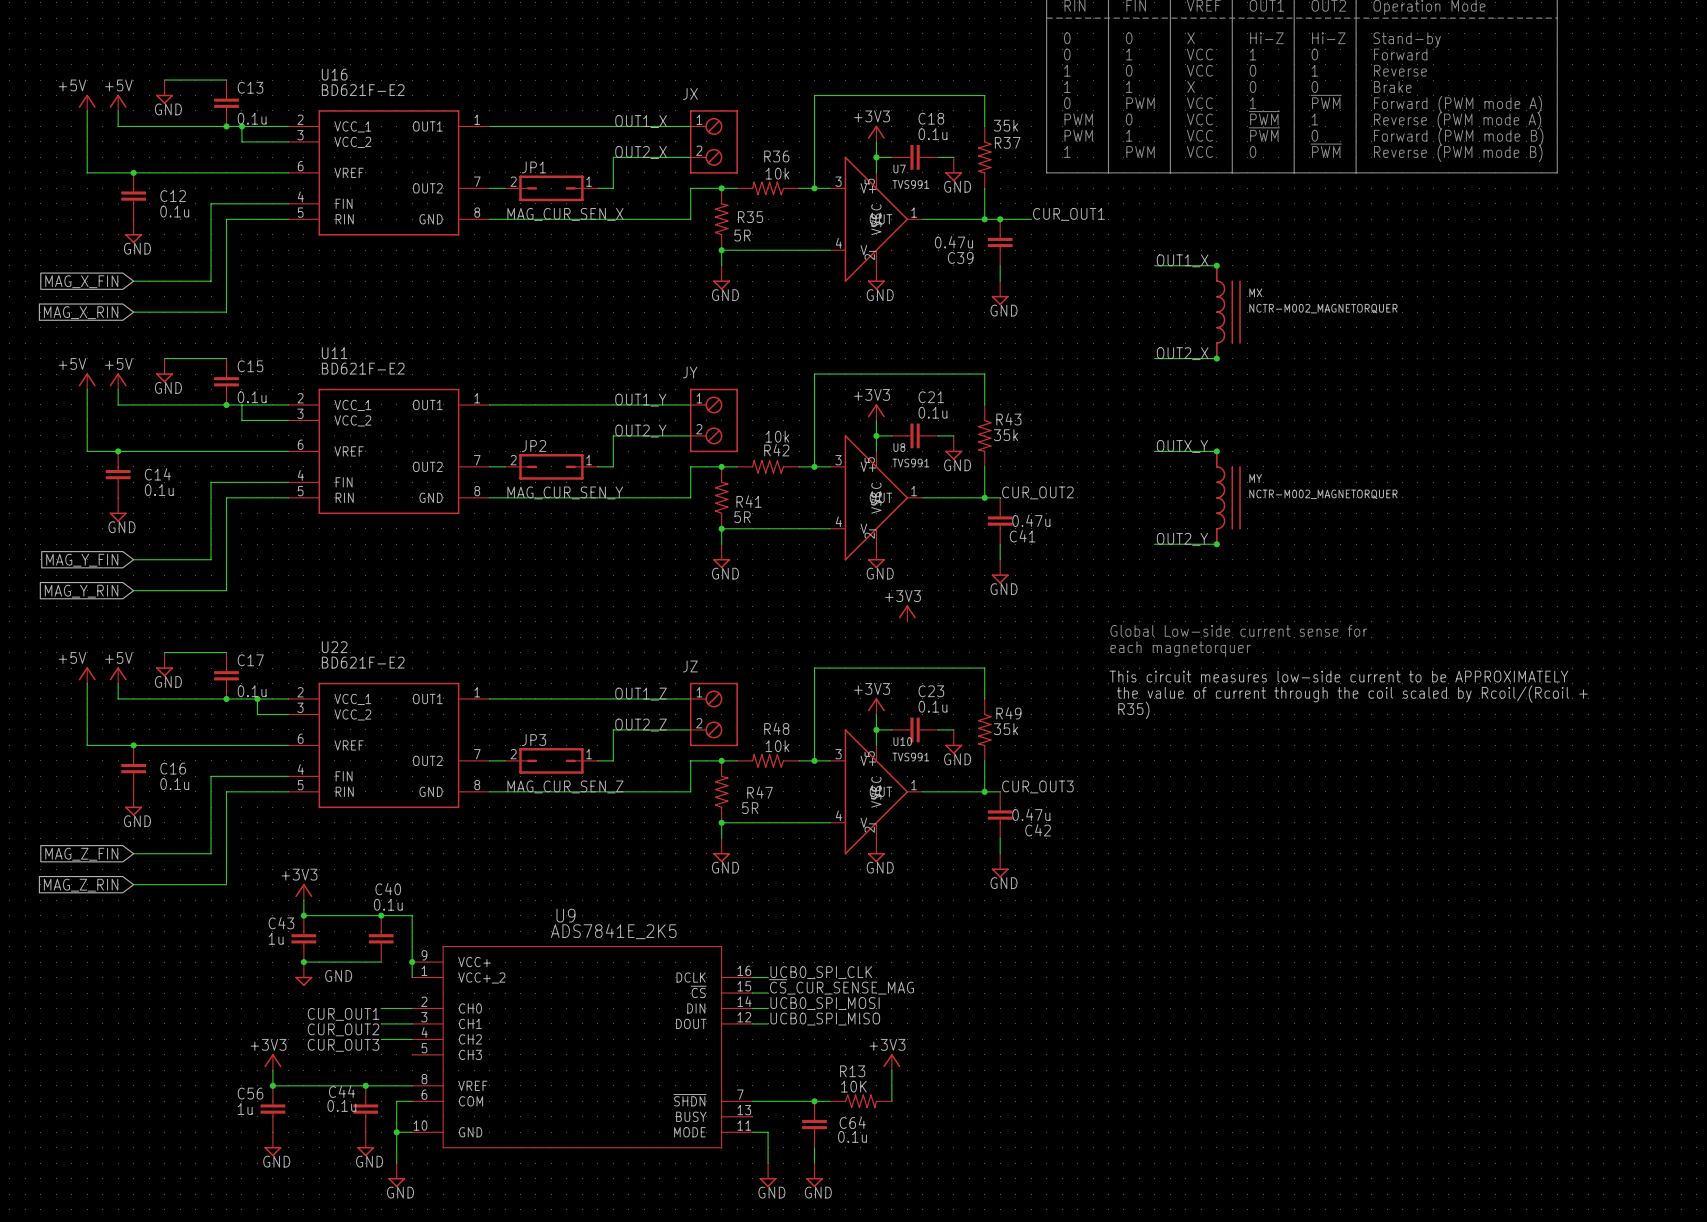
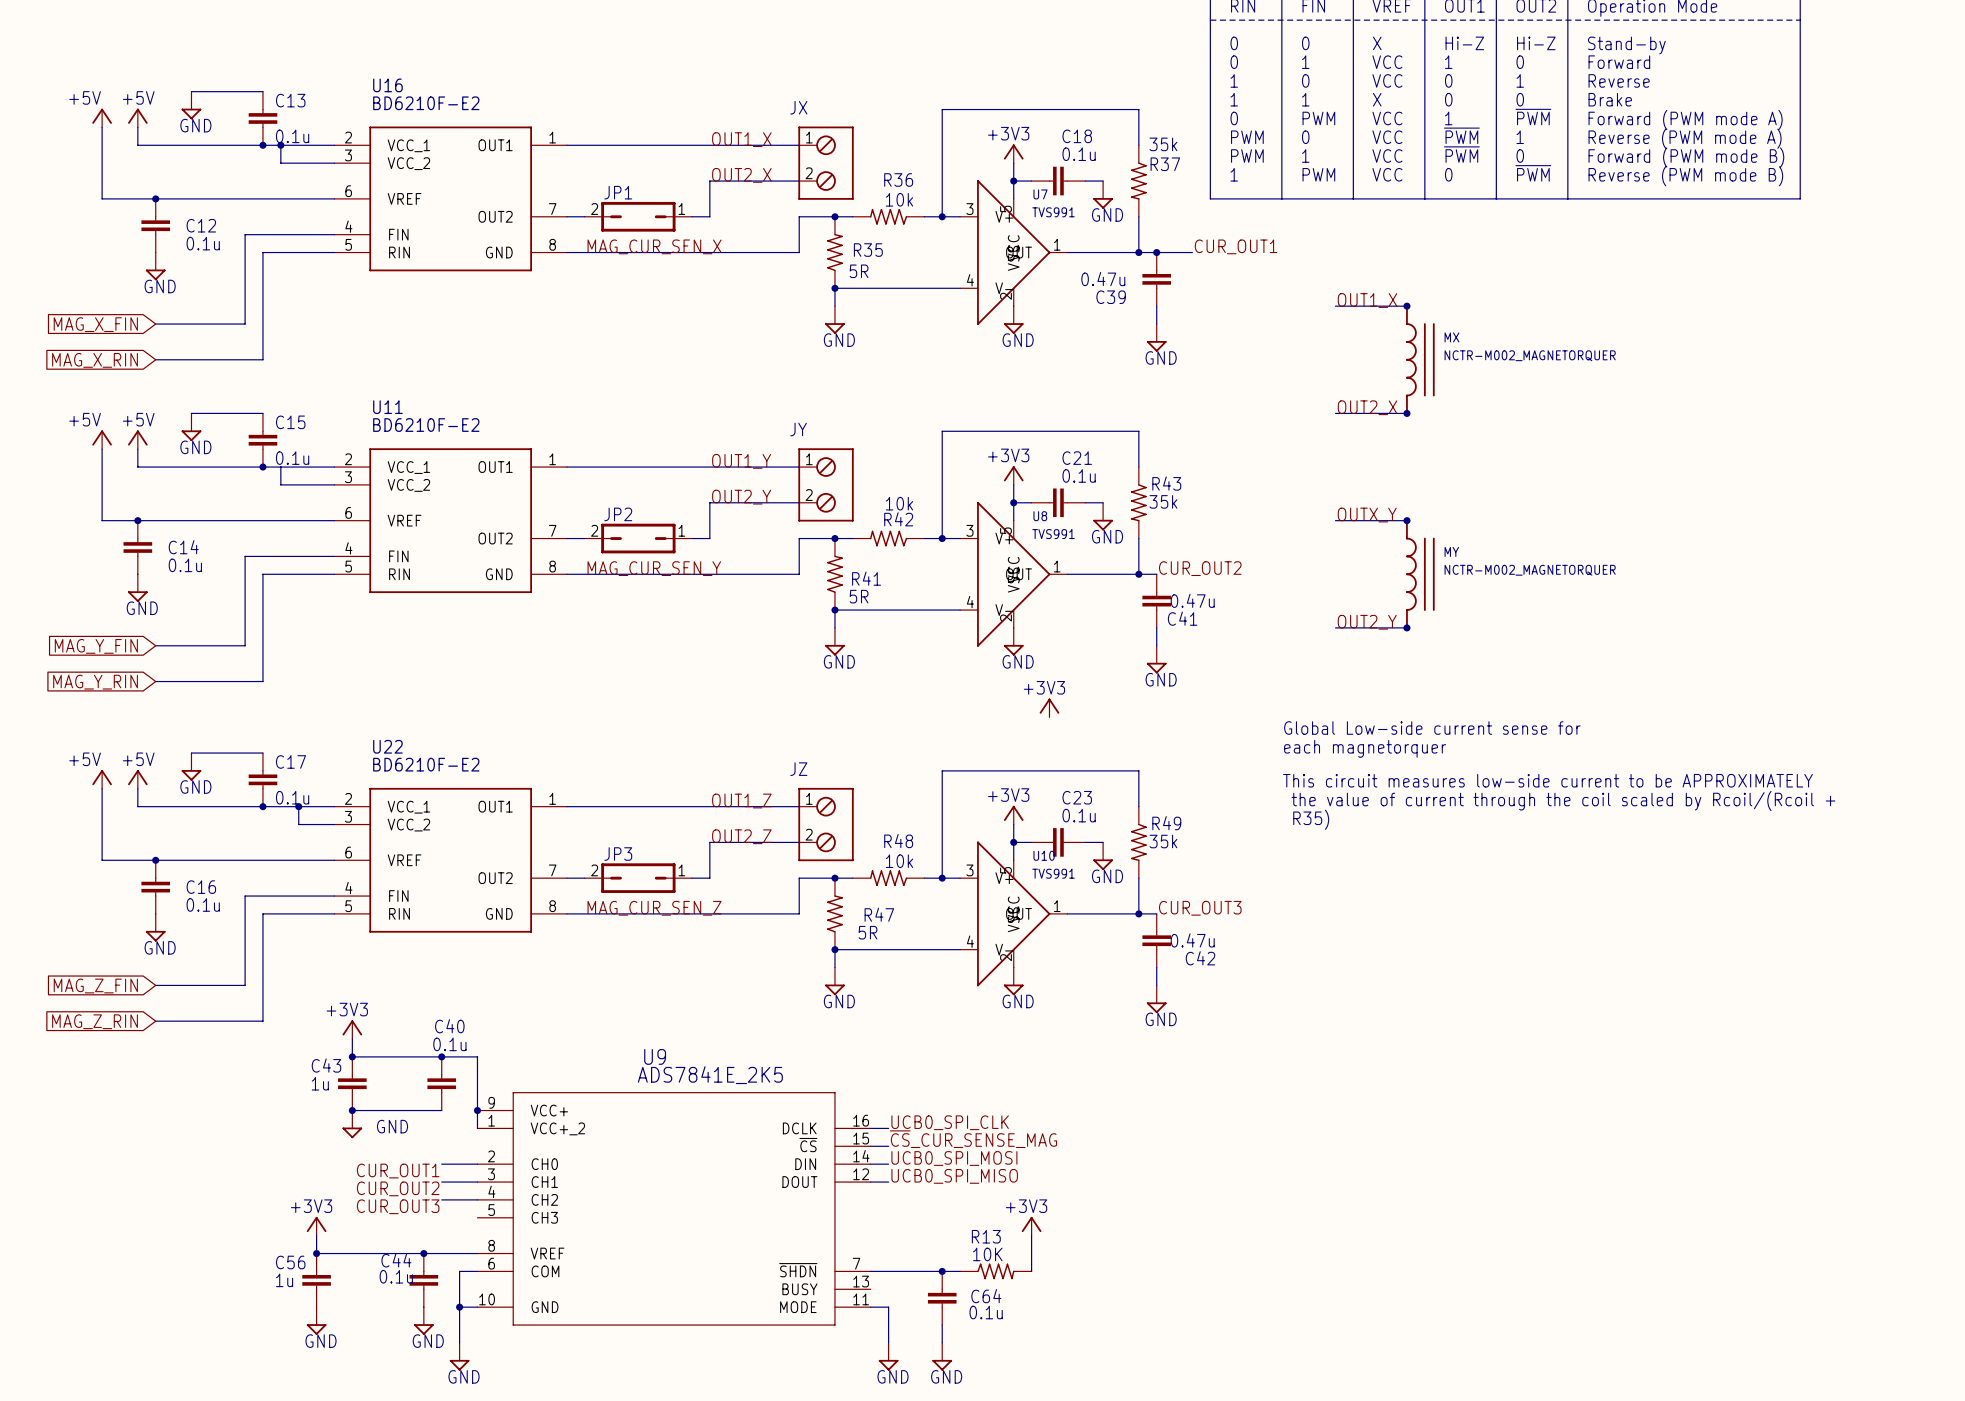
U16 value: BD621F-E2 (363, 90) -> BD6210F-E2 (426, 103)
U11 value: BD621F-E2 (363, 368) -> BD6210F-E2 (426, 425)
U22 value: BD621F-E2 (363, 662) -> BD6210F-E2 (426, 764)

